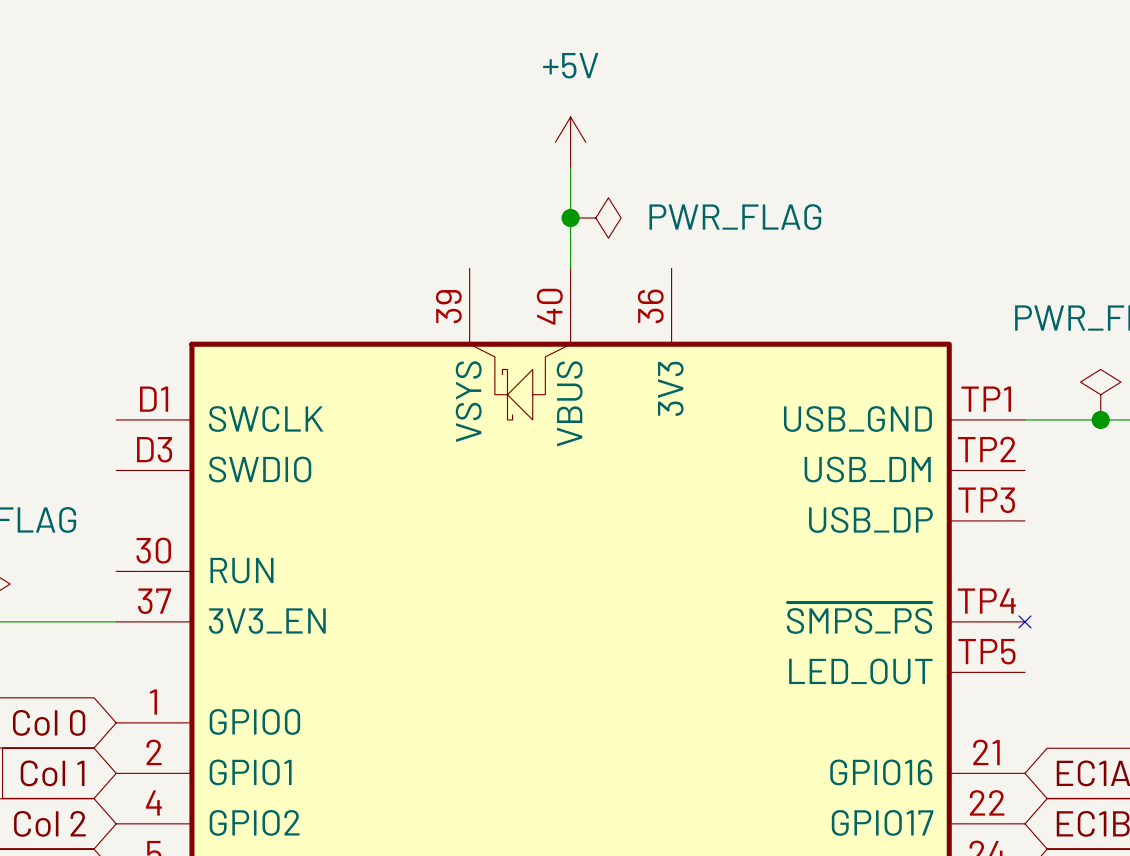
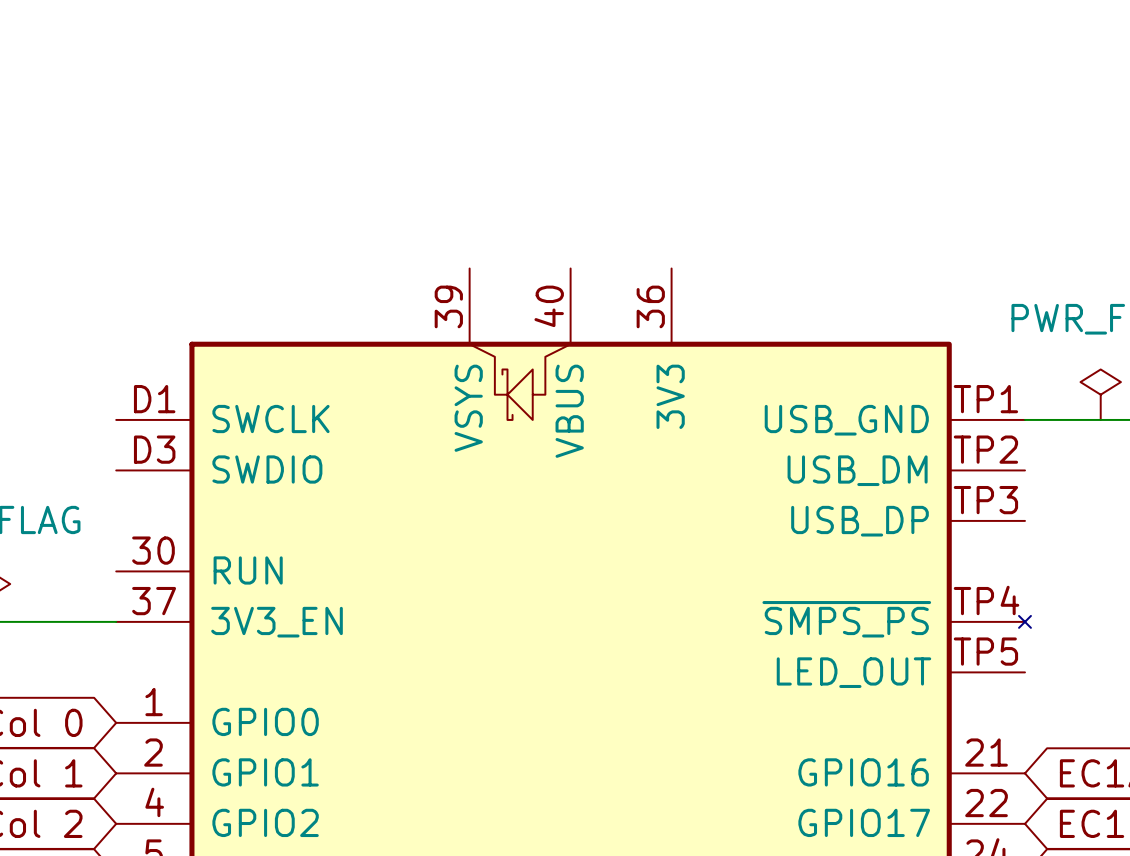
power symbol: +5V (570, 142) -> none
wire: (570, 167) (570, 268) -> none
junction: (570, 218) -> none
power symbol: PWR_FLAG (595, 218) -> none
junction: (1100, 419) -> none

